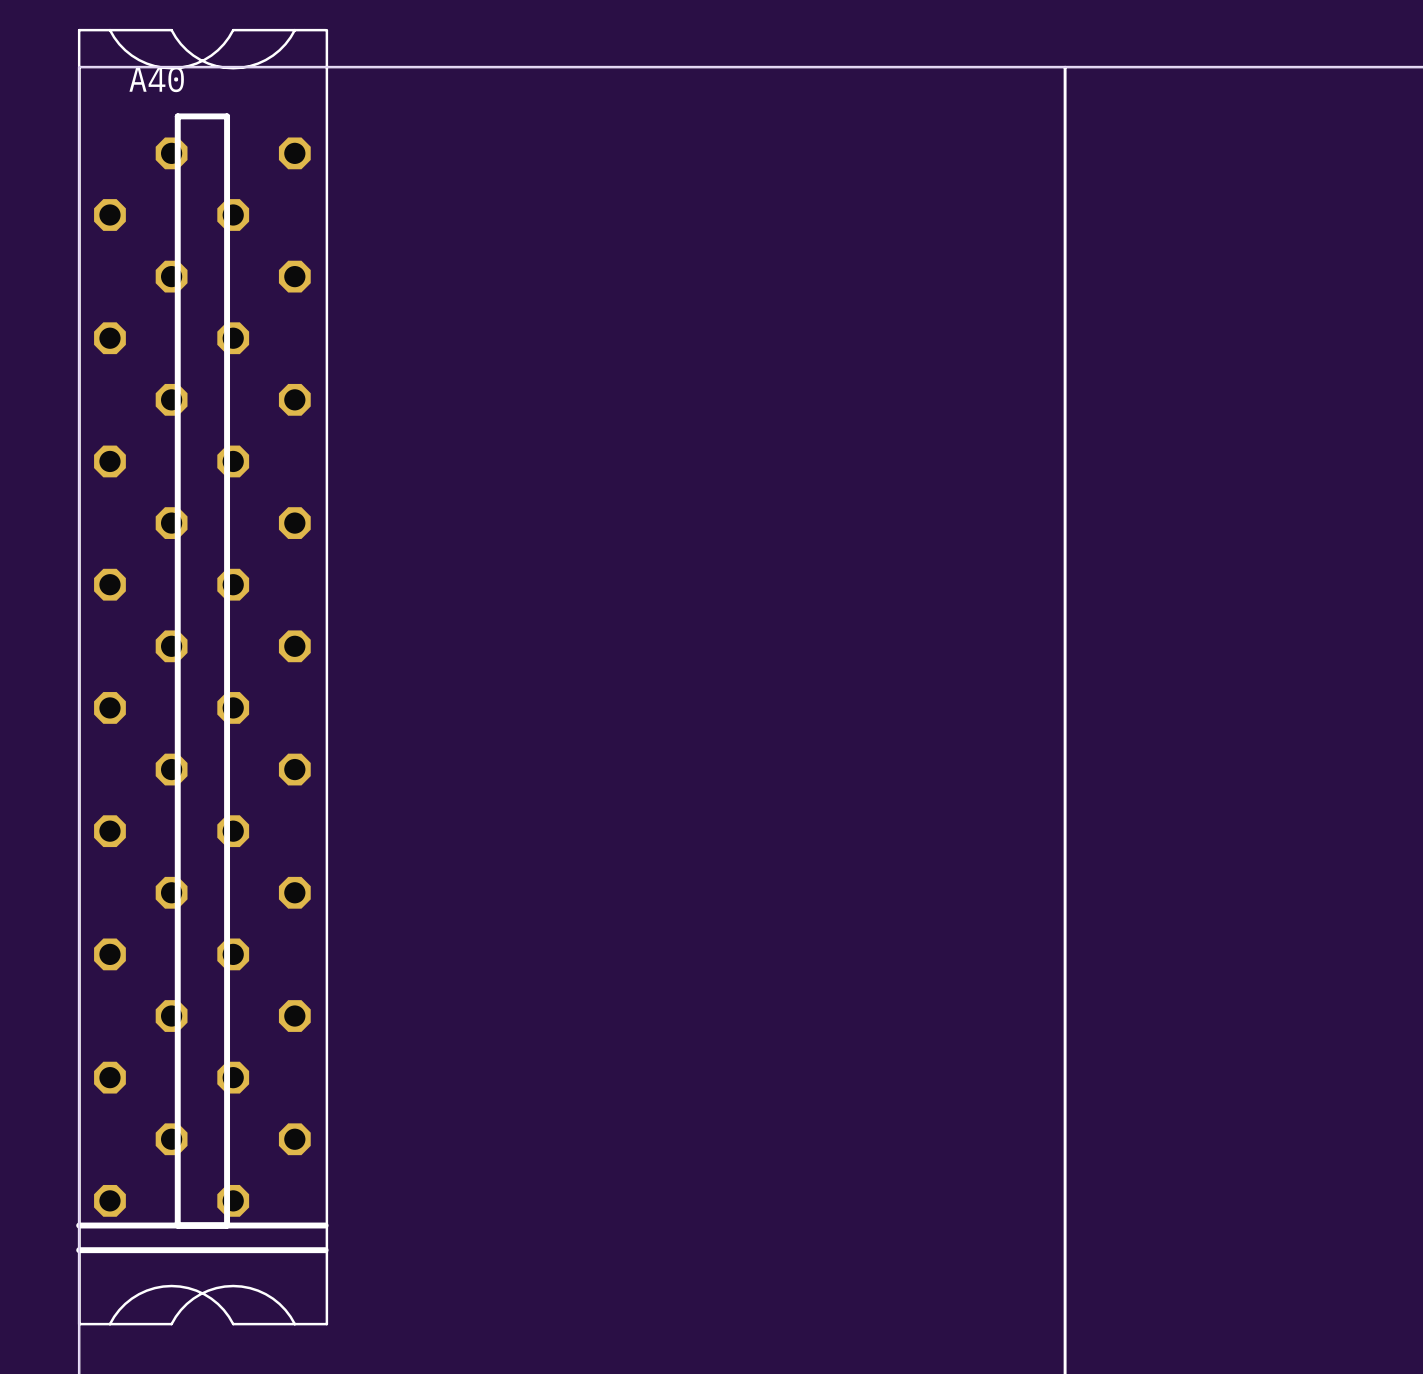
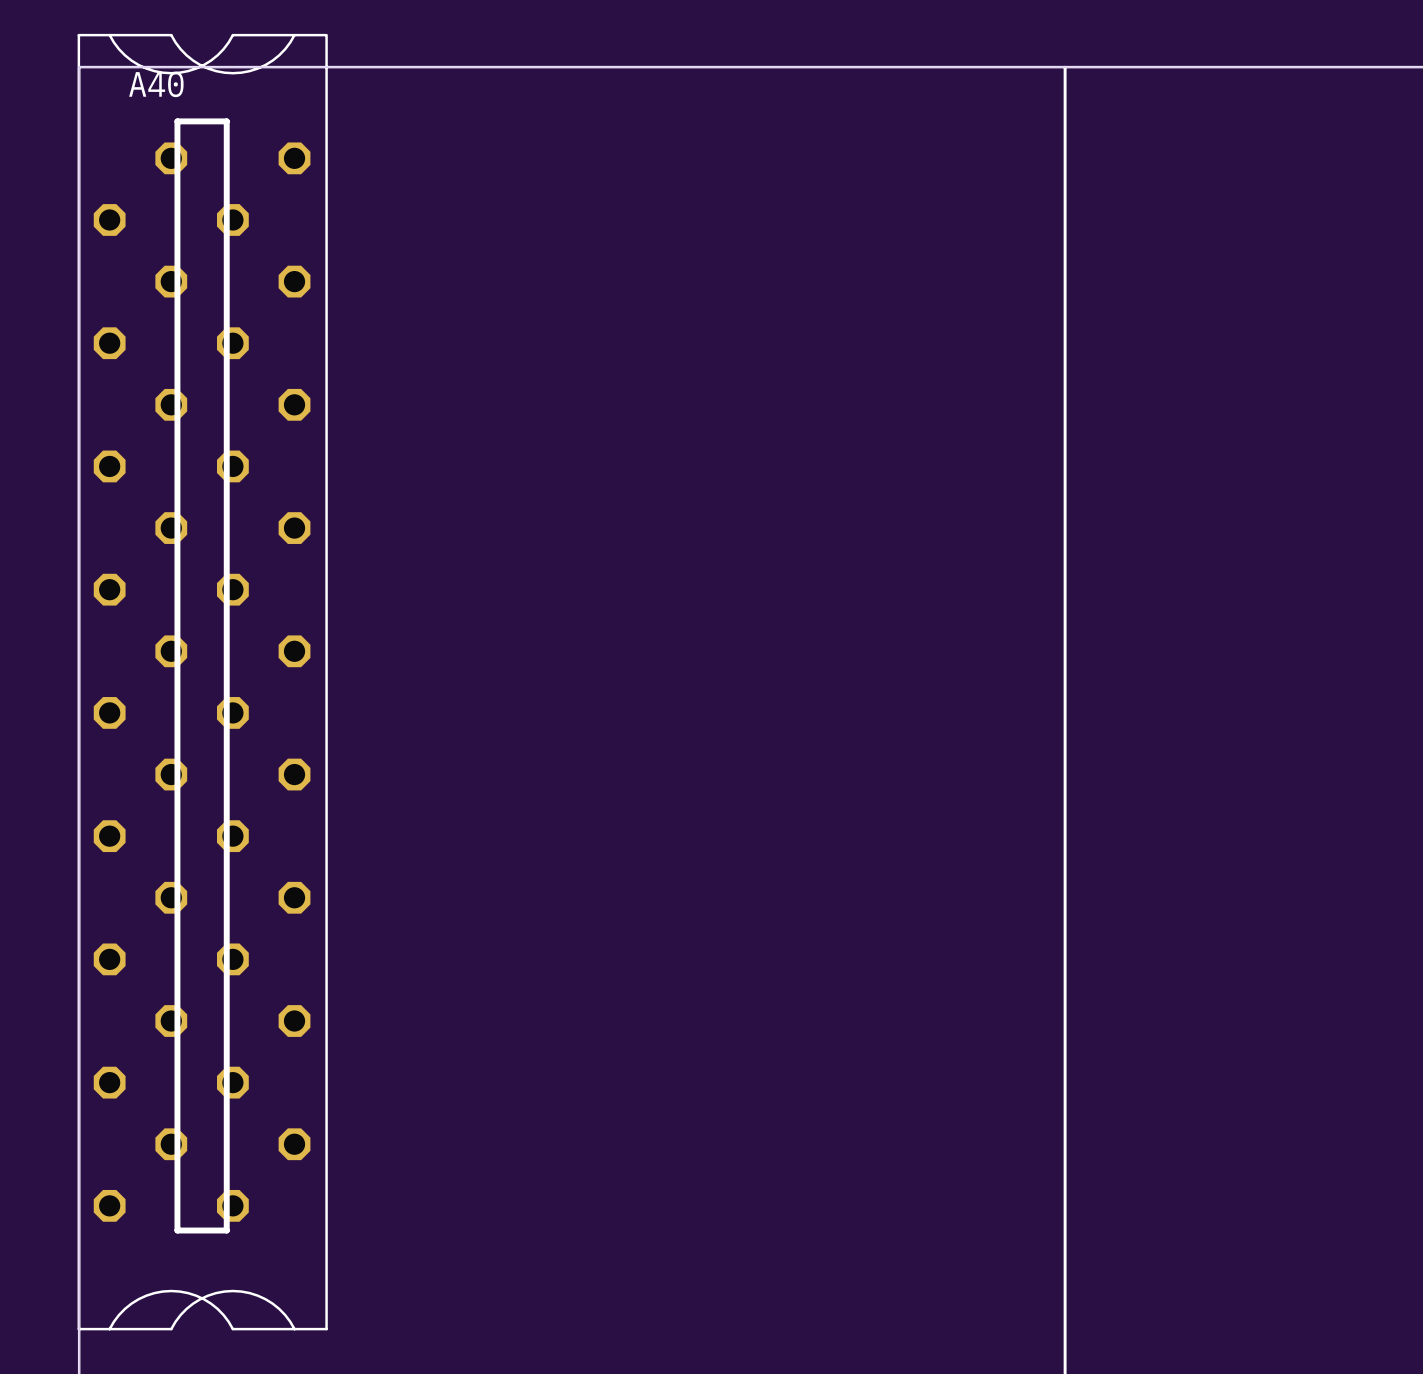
A40 footprint: [76, 28, 329, 1326] -> [77, 33, 328, 1331]

